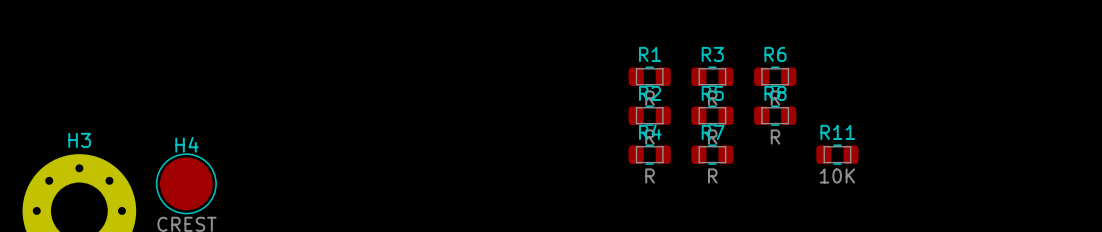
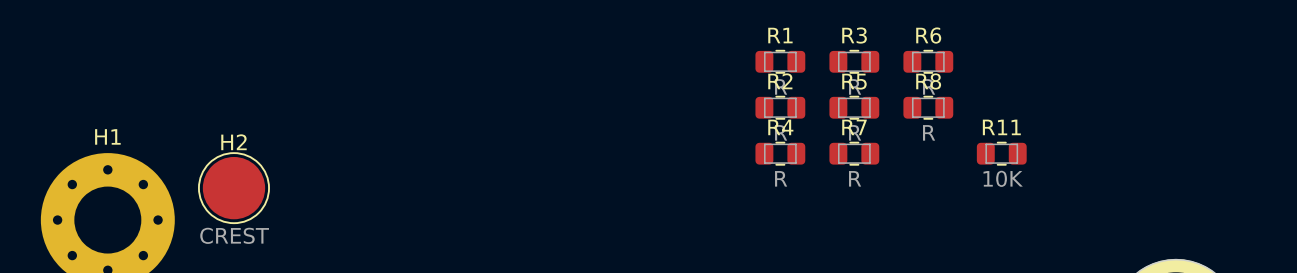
H3 name: H3 (79, 140) -> H1 (107, 136)
H4 name: H4 (186, 144) -> H2 (233, 142)

